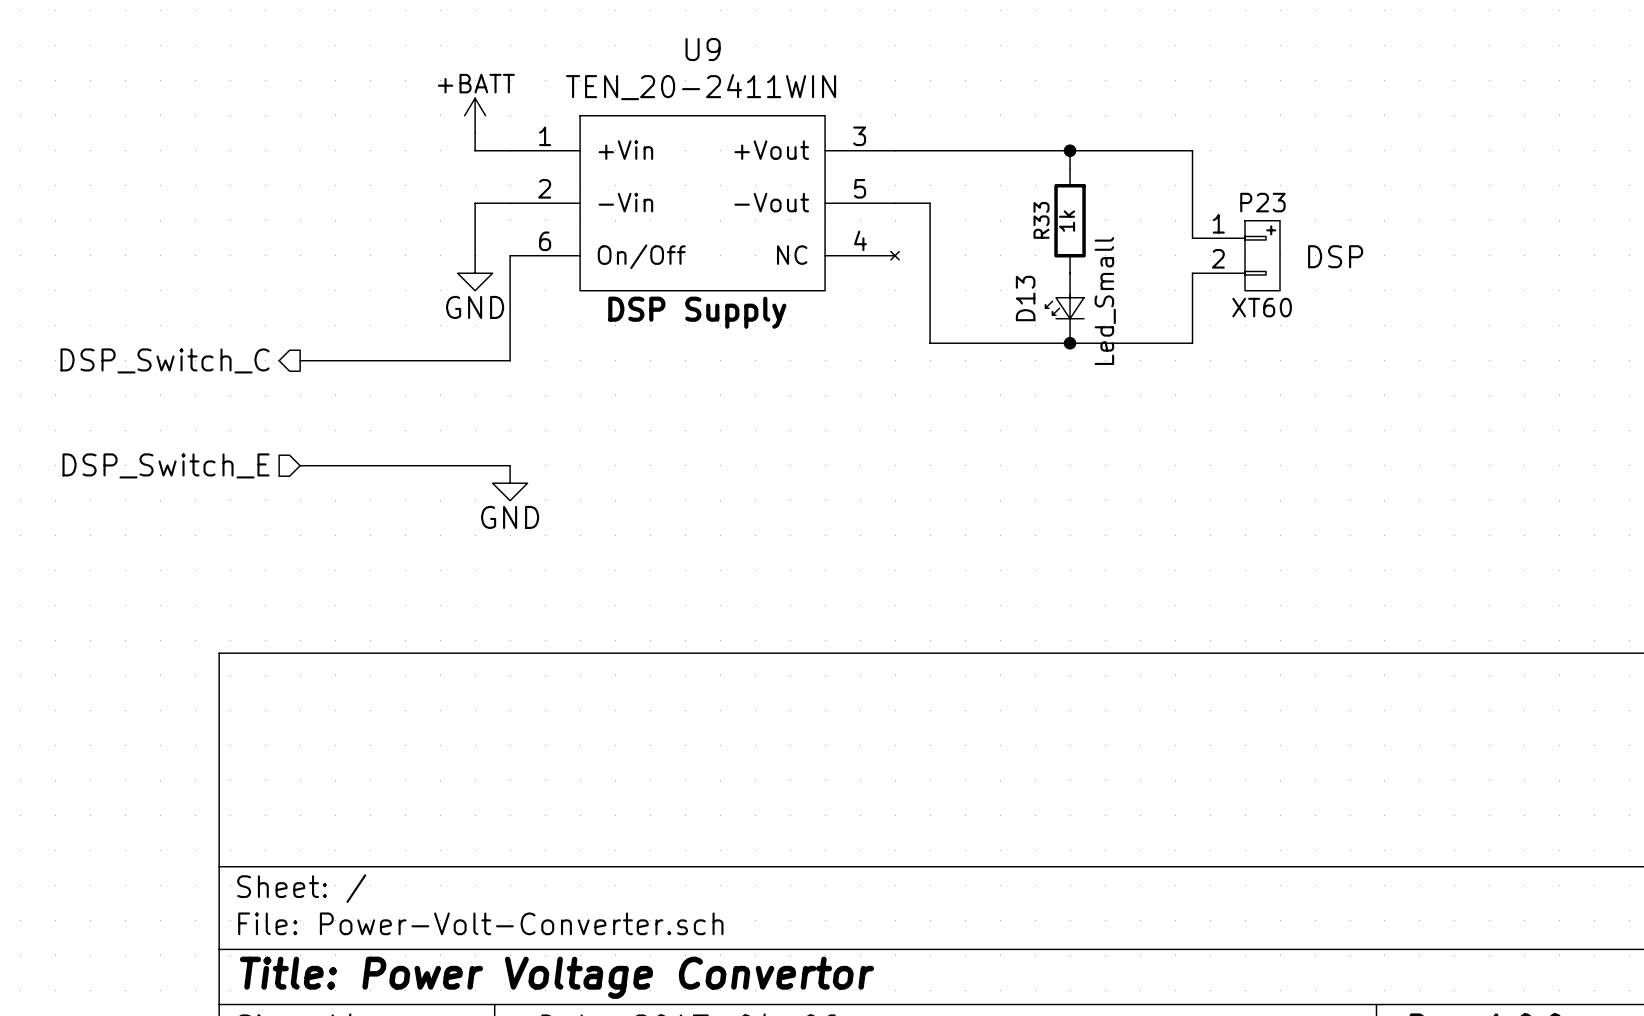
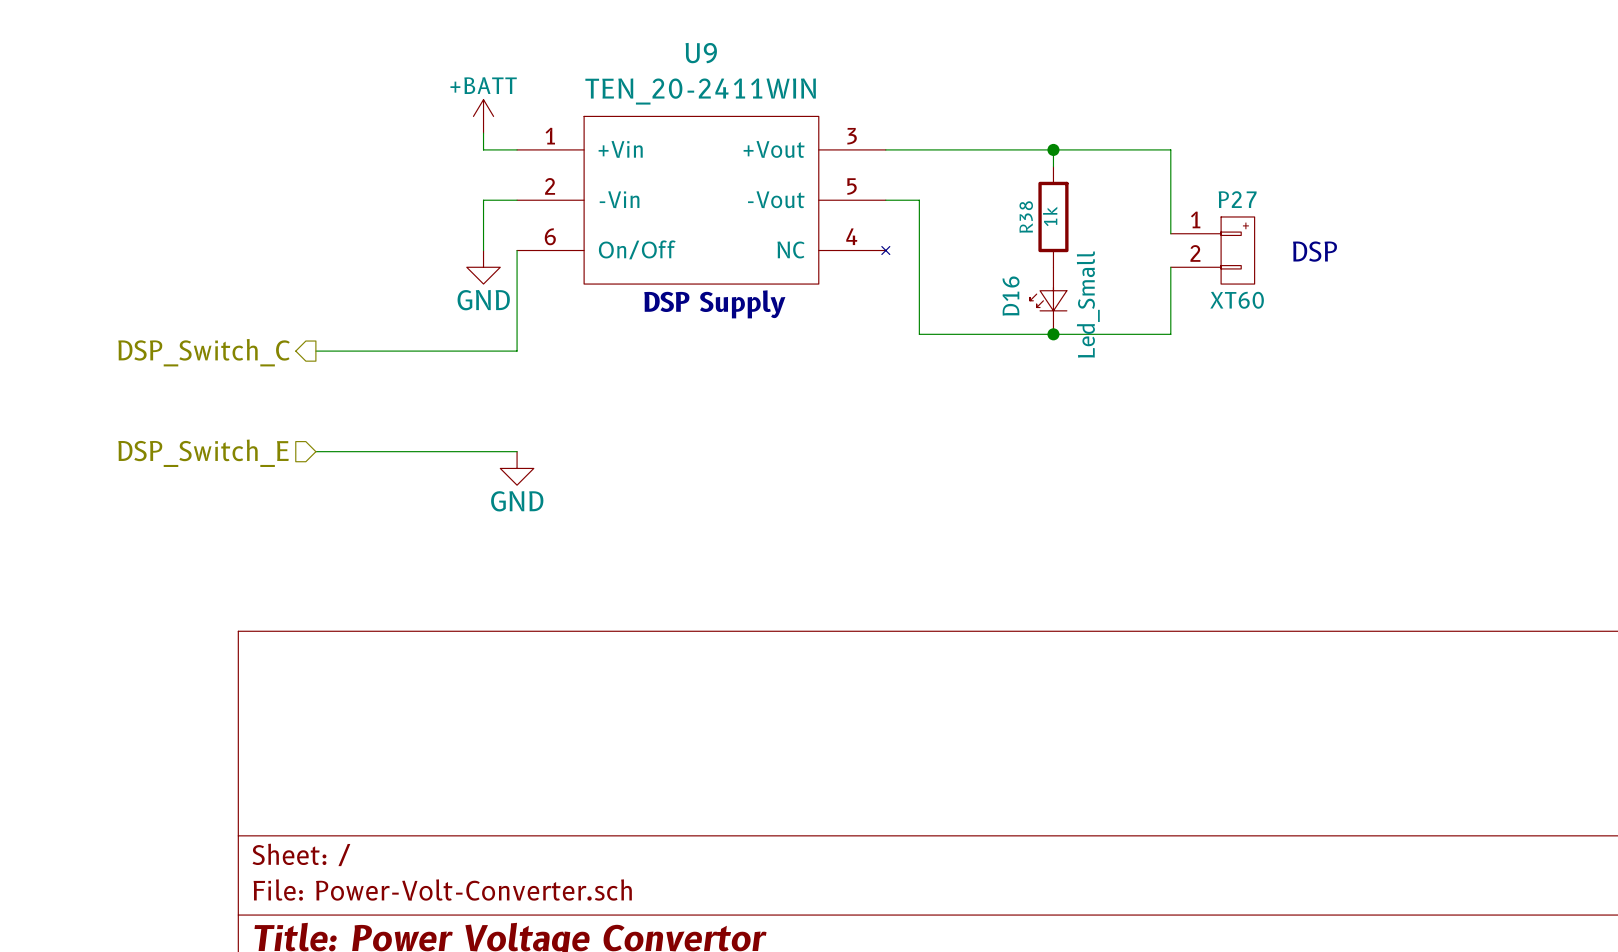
P23 name: P23 (1262, 202) -> P27 (1237, 199)
R33 name: R33 (1041, 220) -> R38 (1026, 217)
D13 name: D13 (1025, 298) -> D16 (1011, 296)

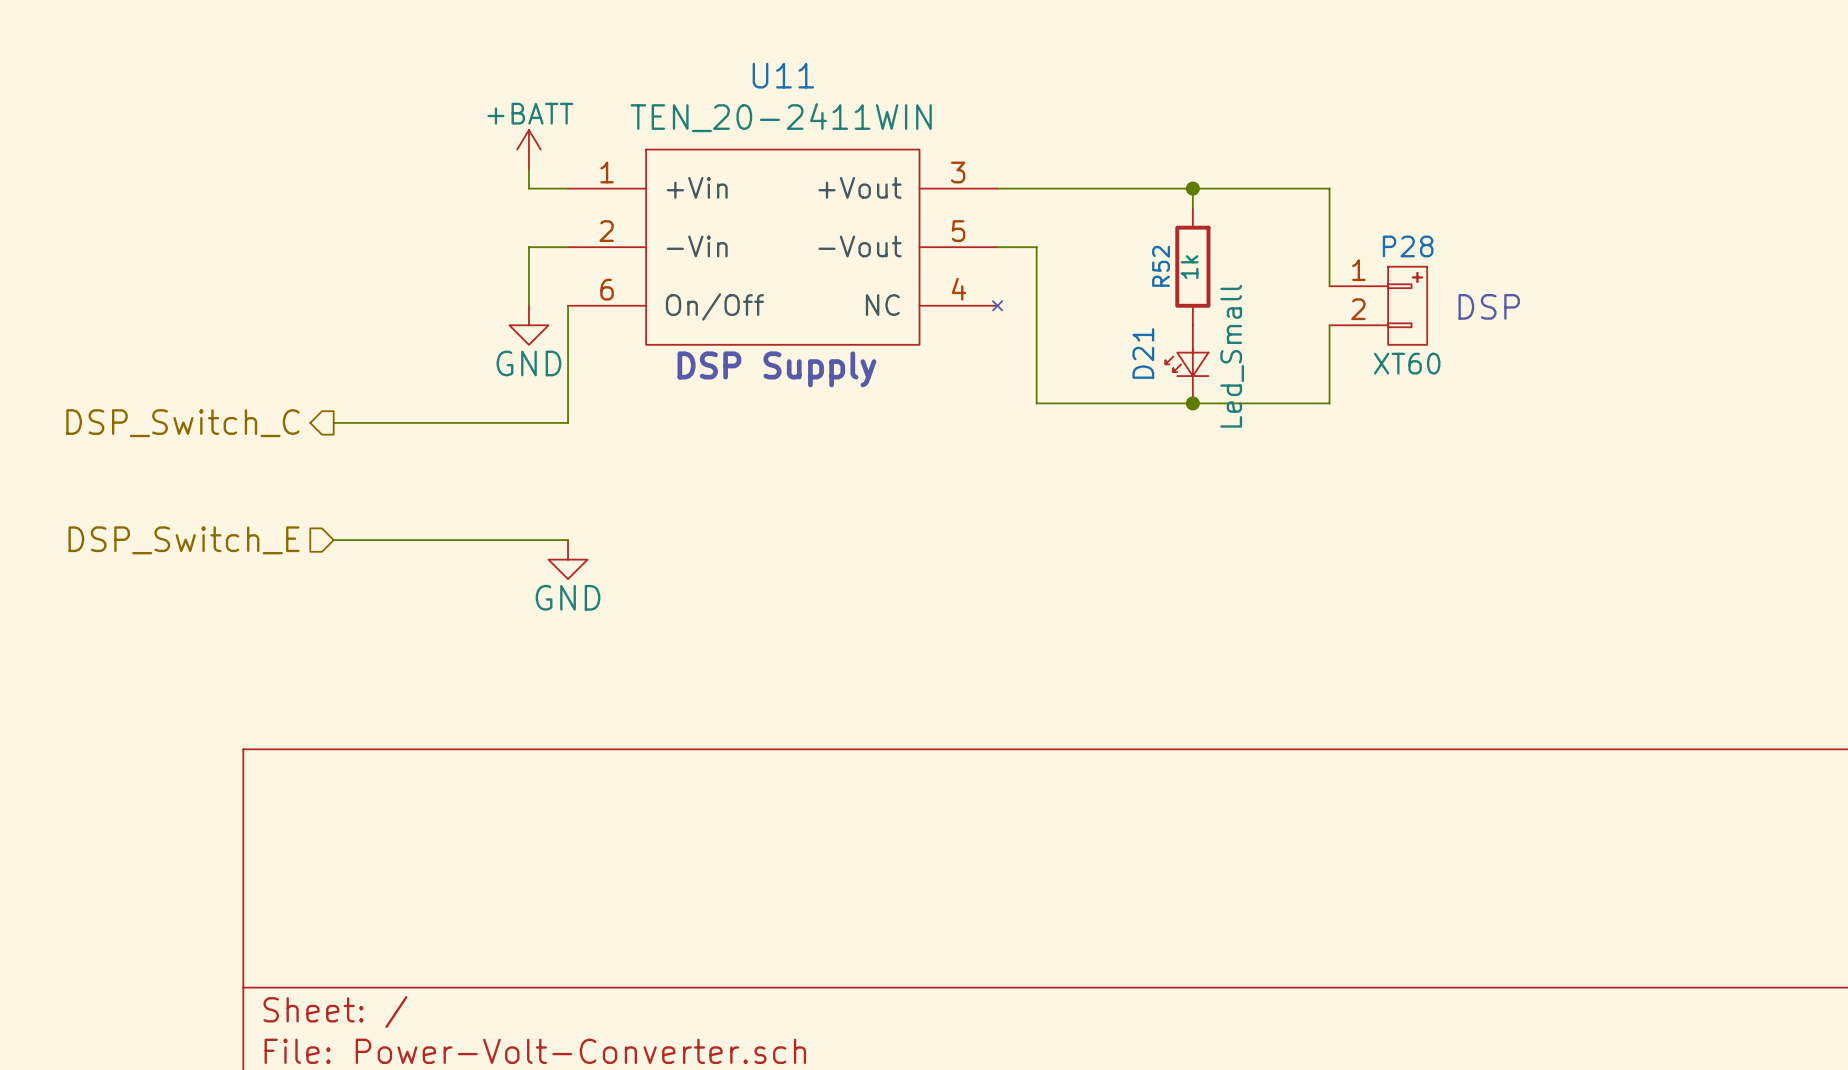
U9 name: U9 (701, 53) -> U11 (783, 75)
P27 name: P27 (1237, 199) -> P28 (1408, 246)
R38 name: R38 (1026, 217) -> R52 (1161, 266)
D16 name: D16 (1011, 296) -> D21 (1143, 353)

